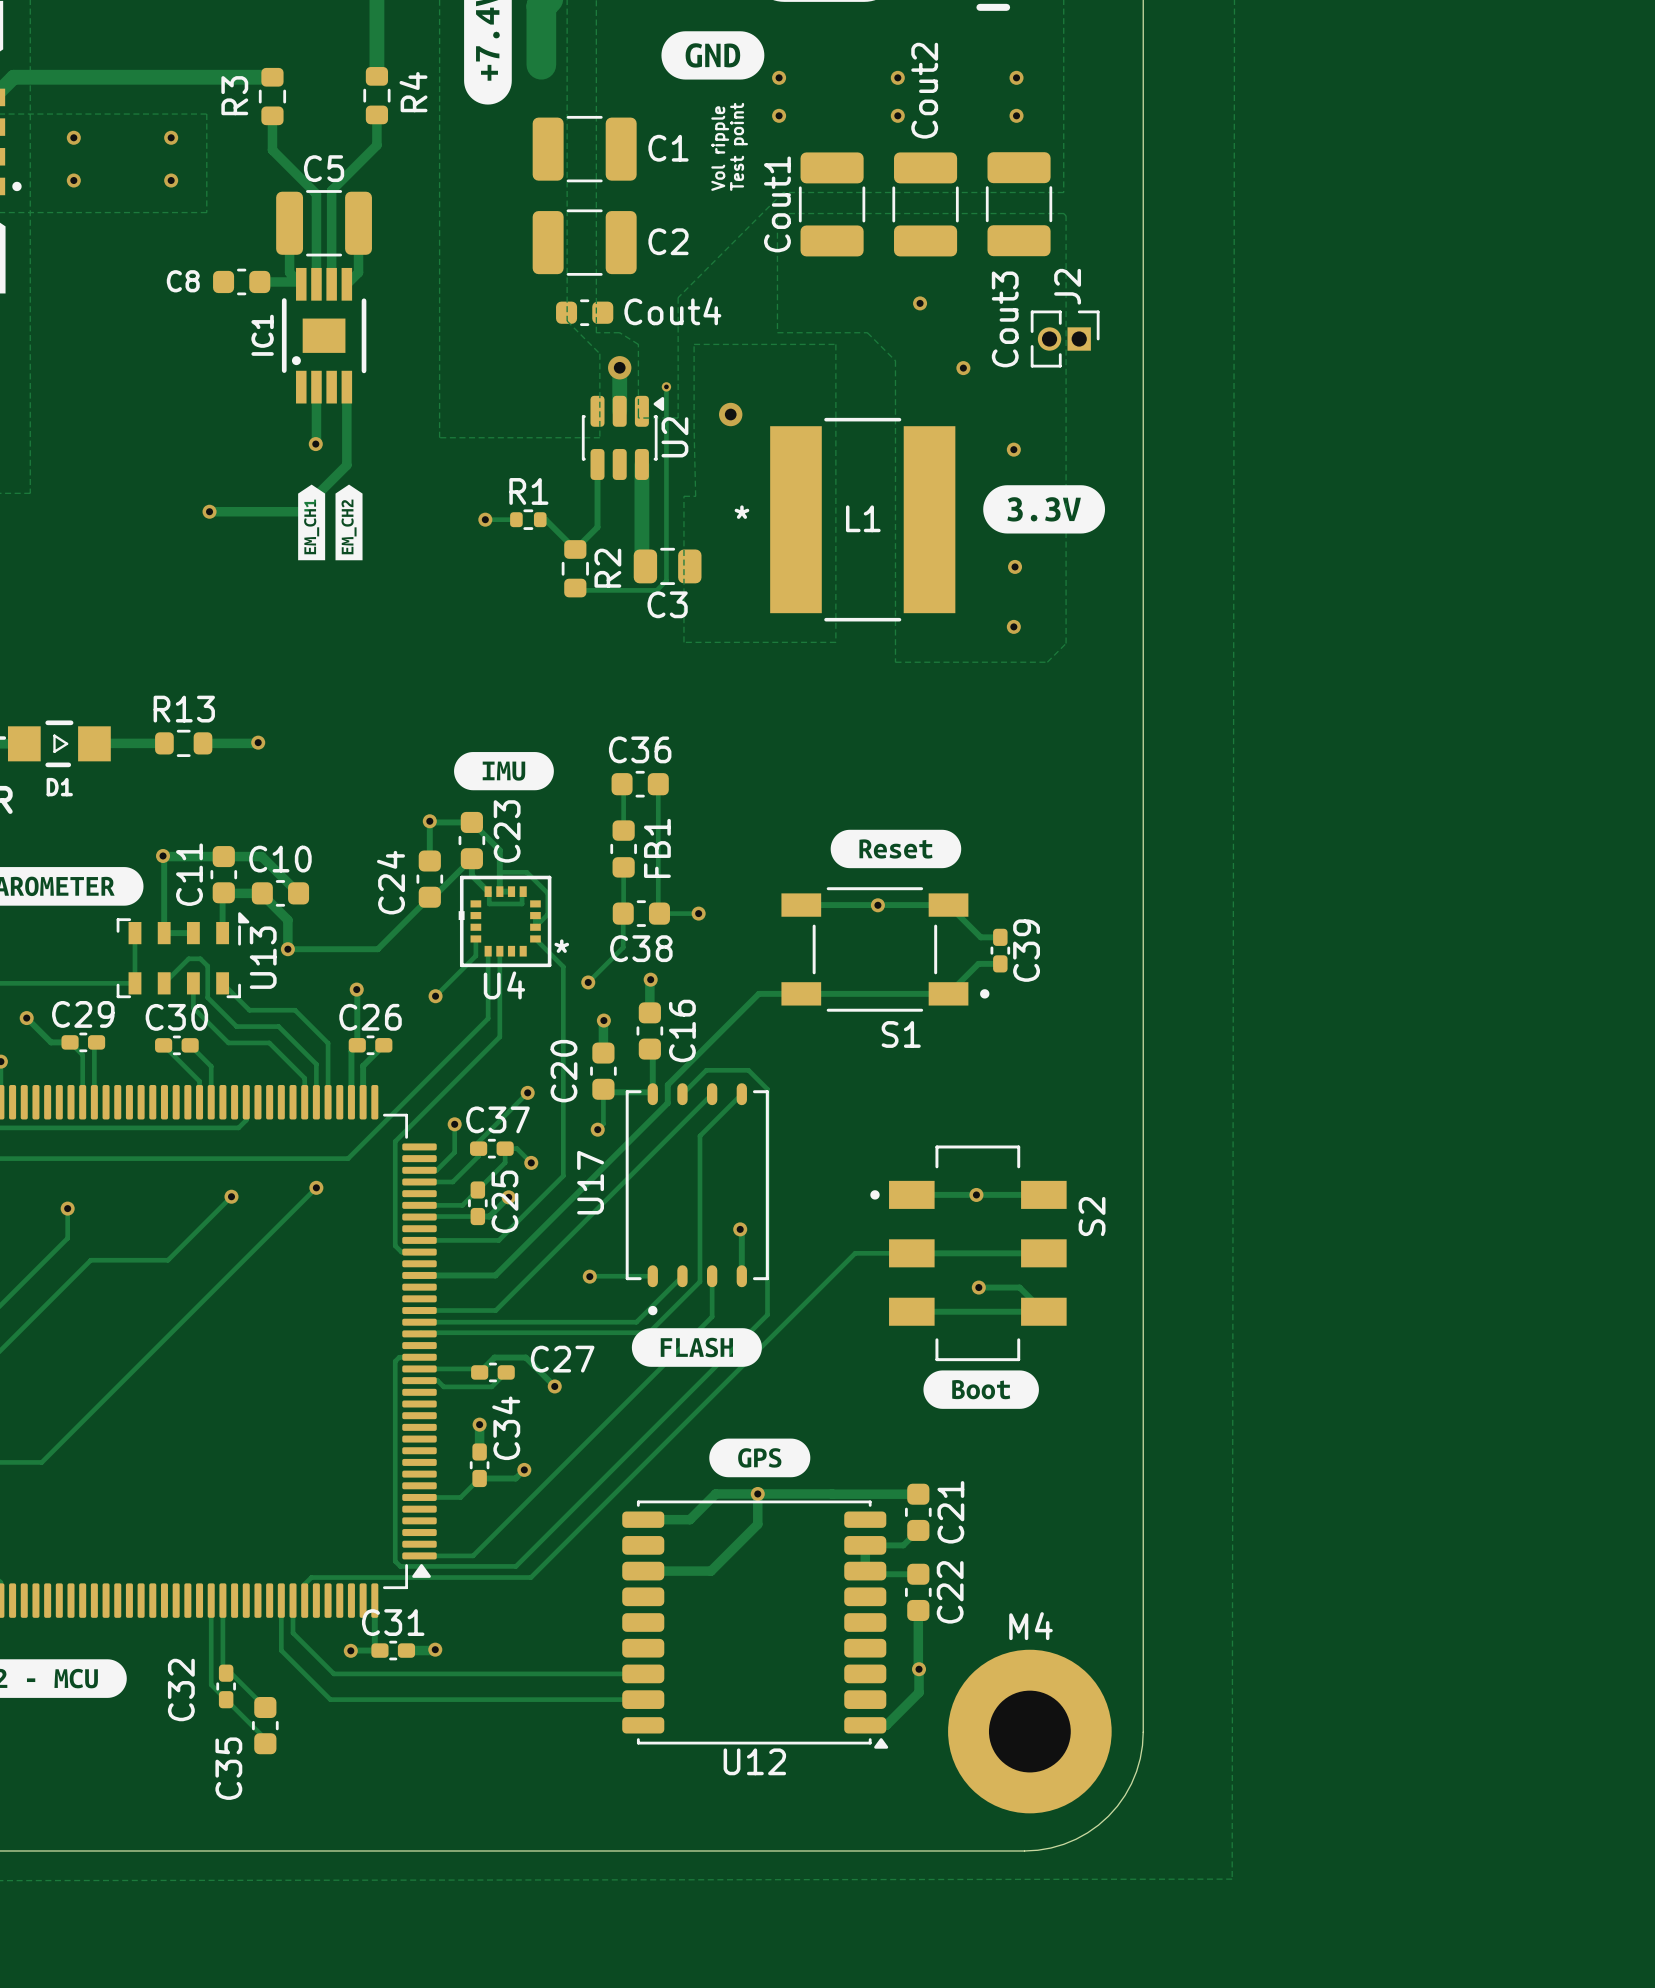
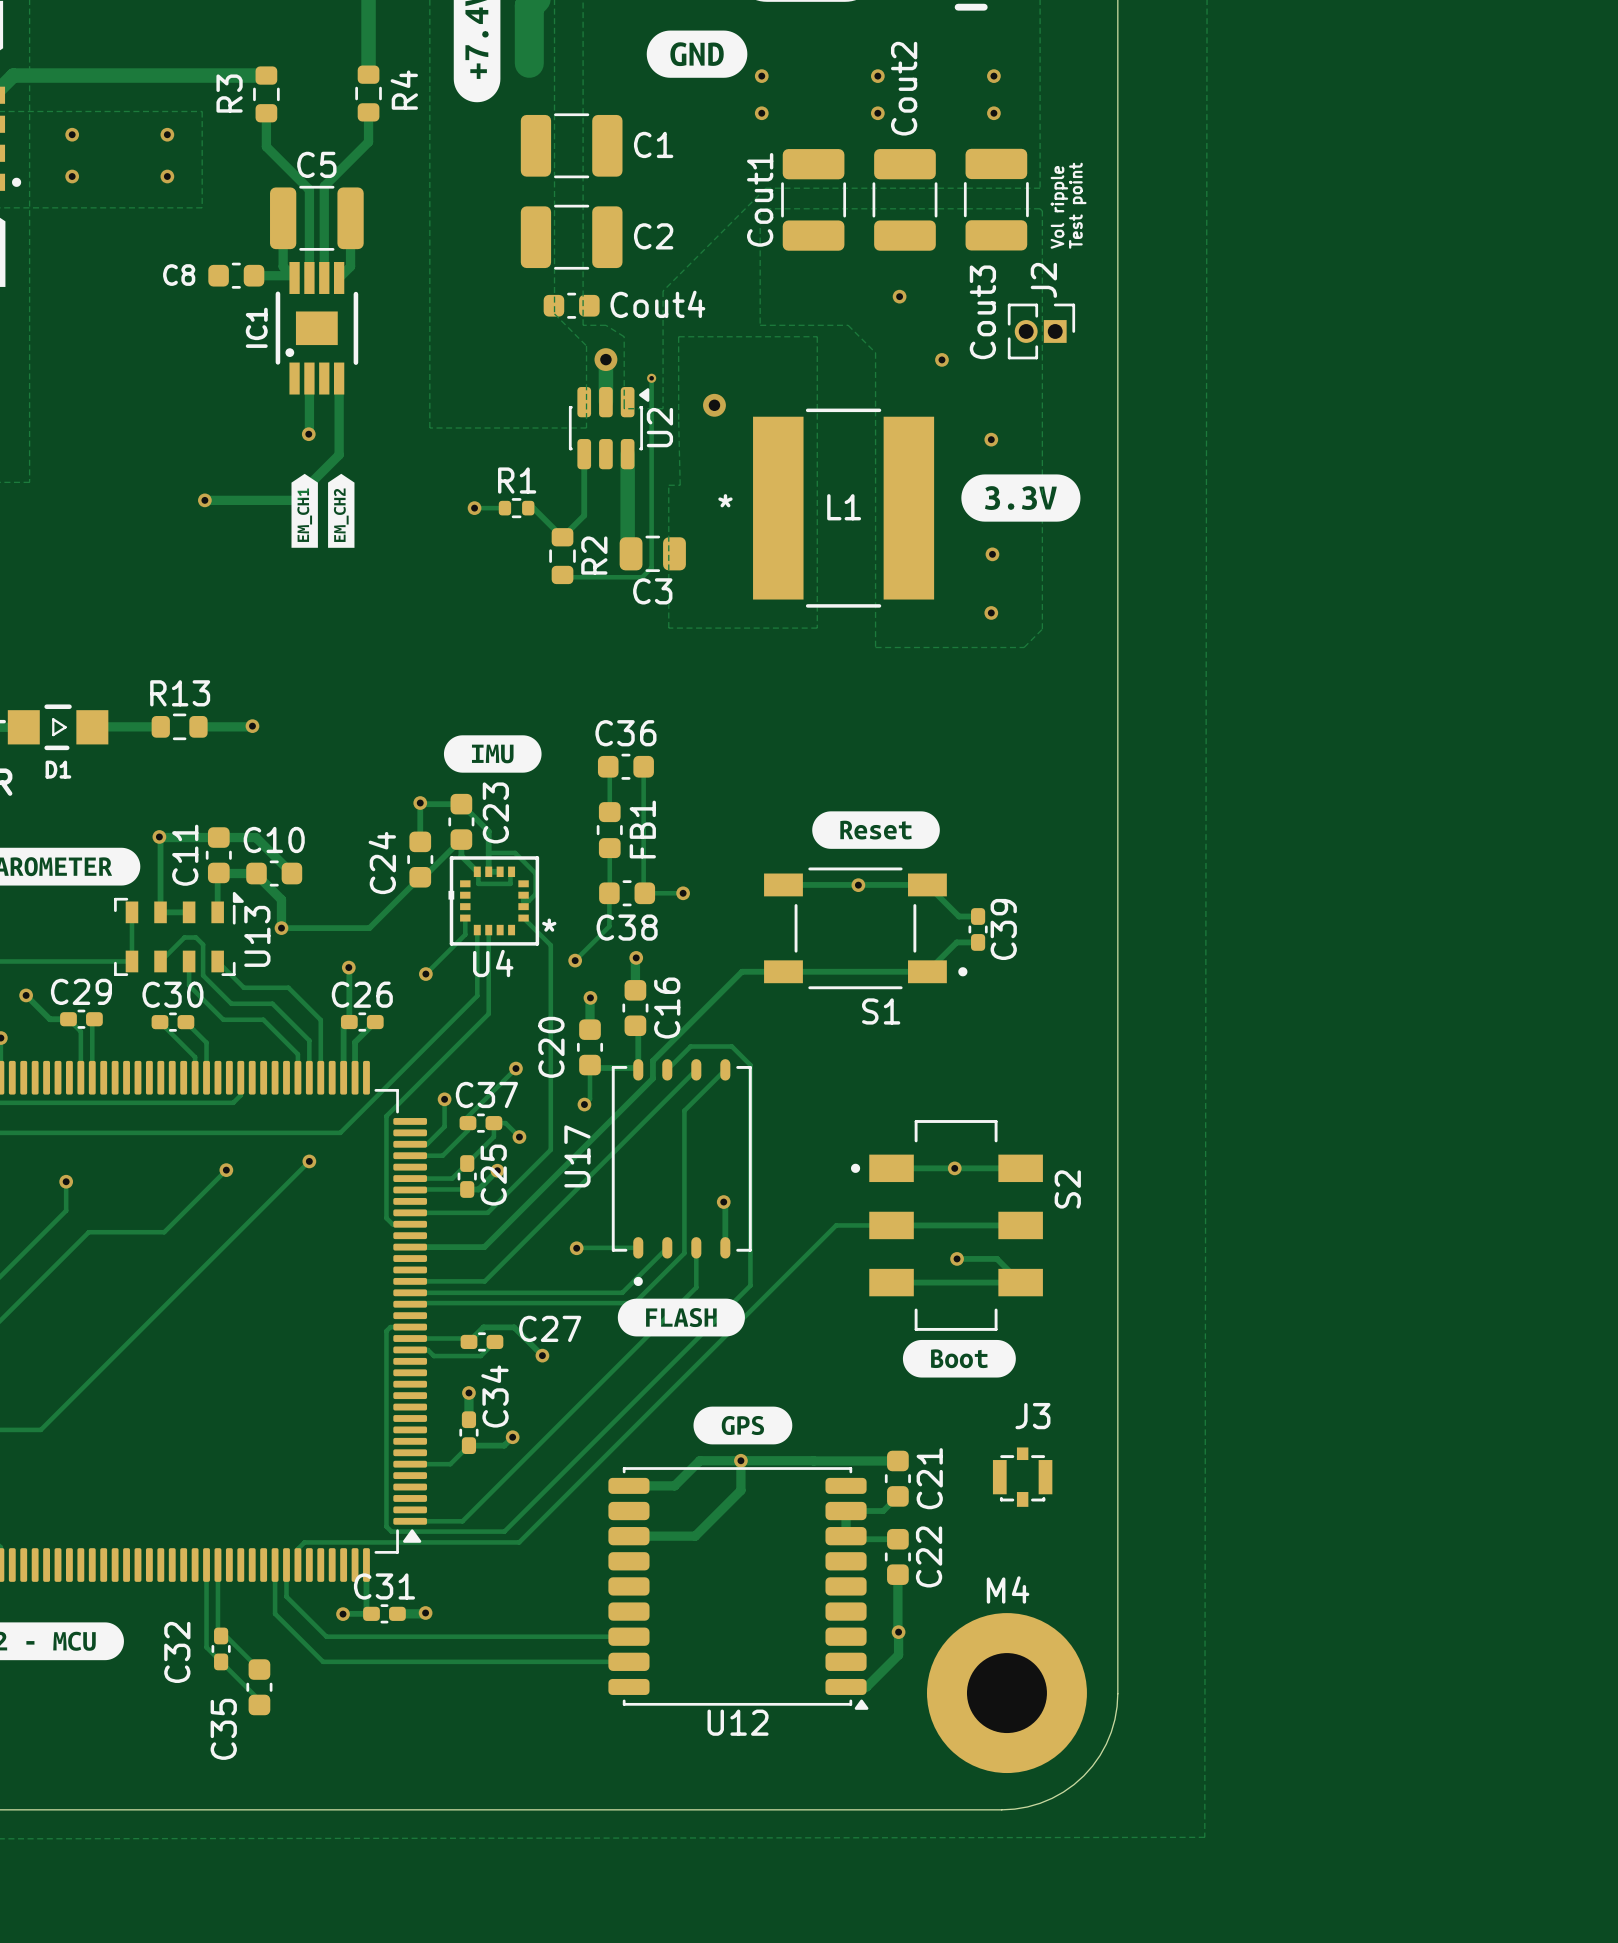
text position: Test point (739, 146) -> Test point (1077, 205)
text position: Vol ripple (720, 148) -> Vol ripple (1059, 207)
J3: none -> (1022, 1477)

